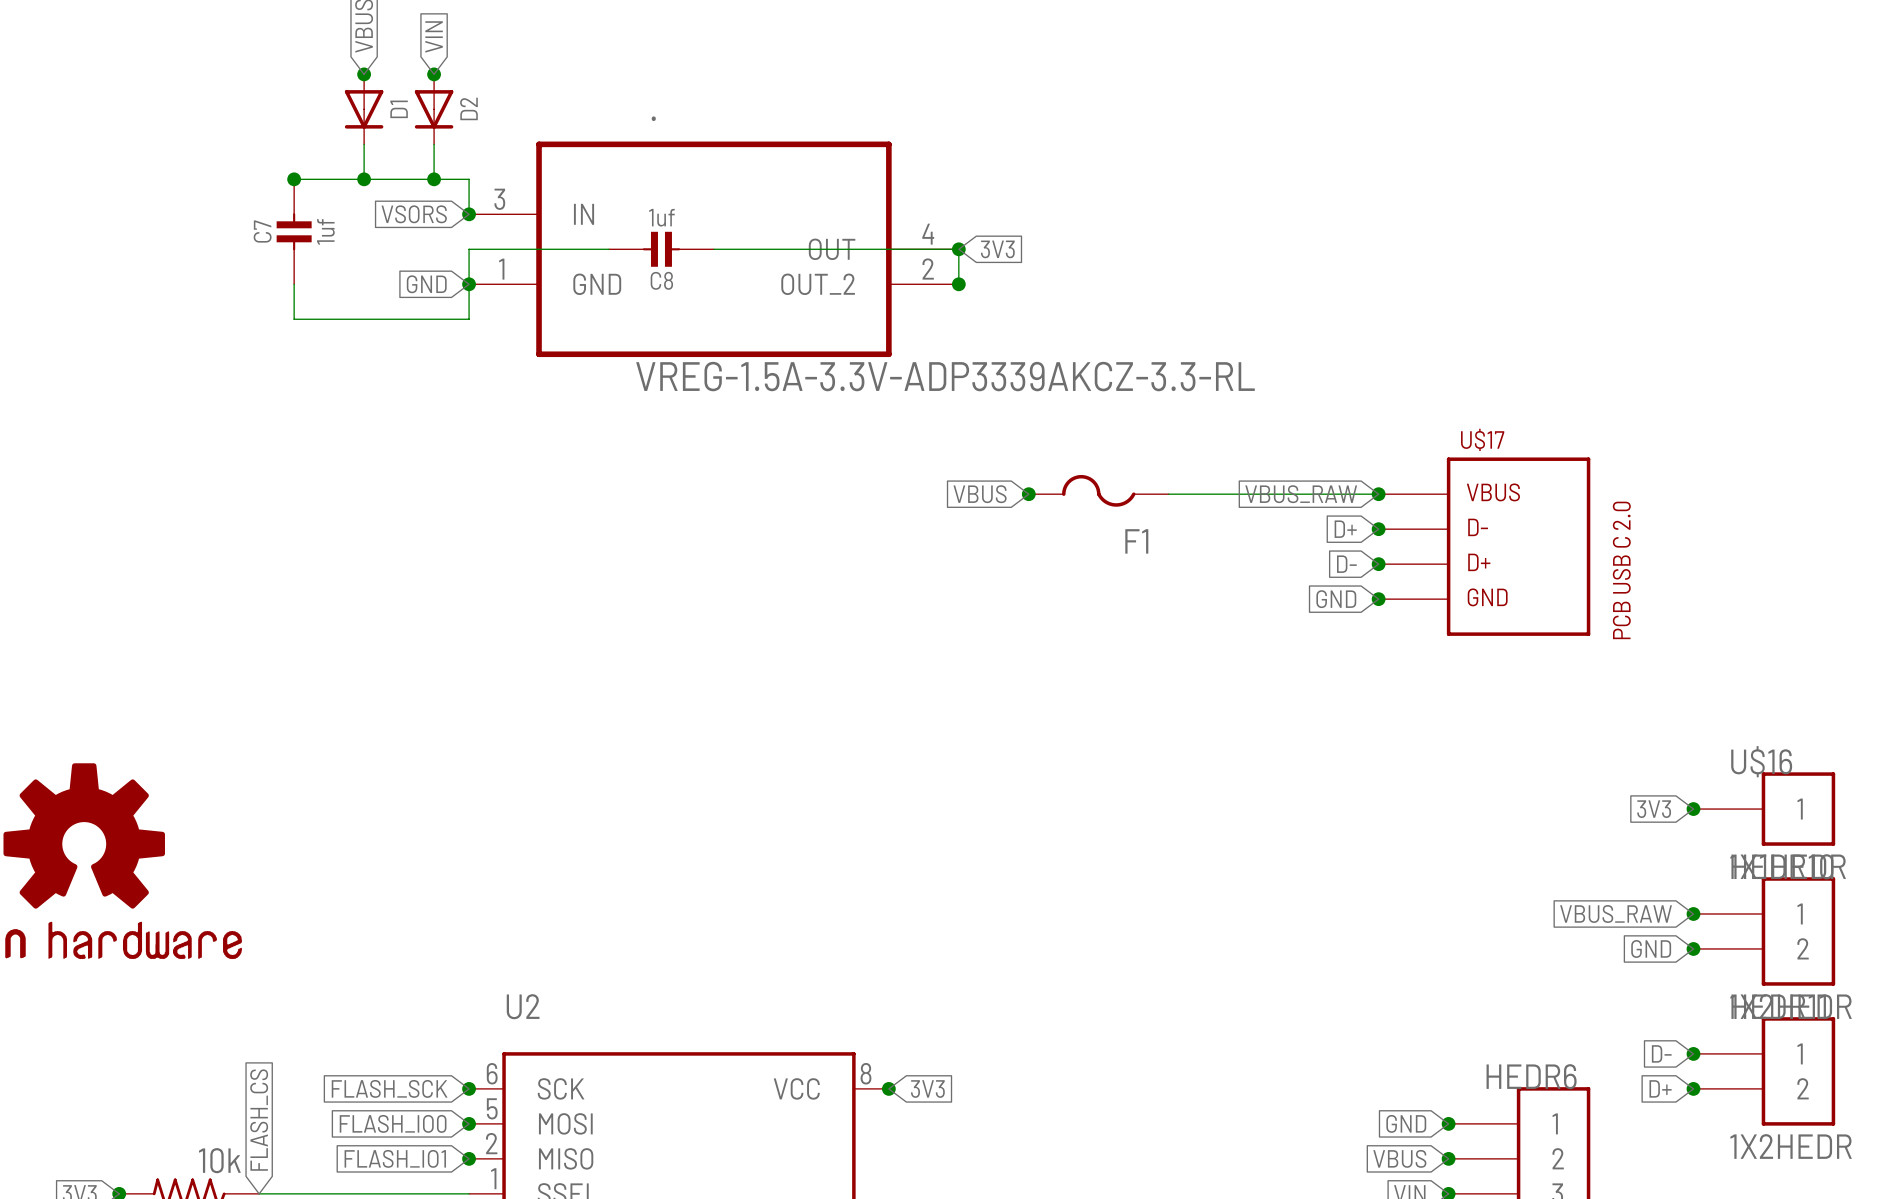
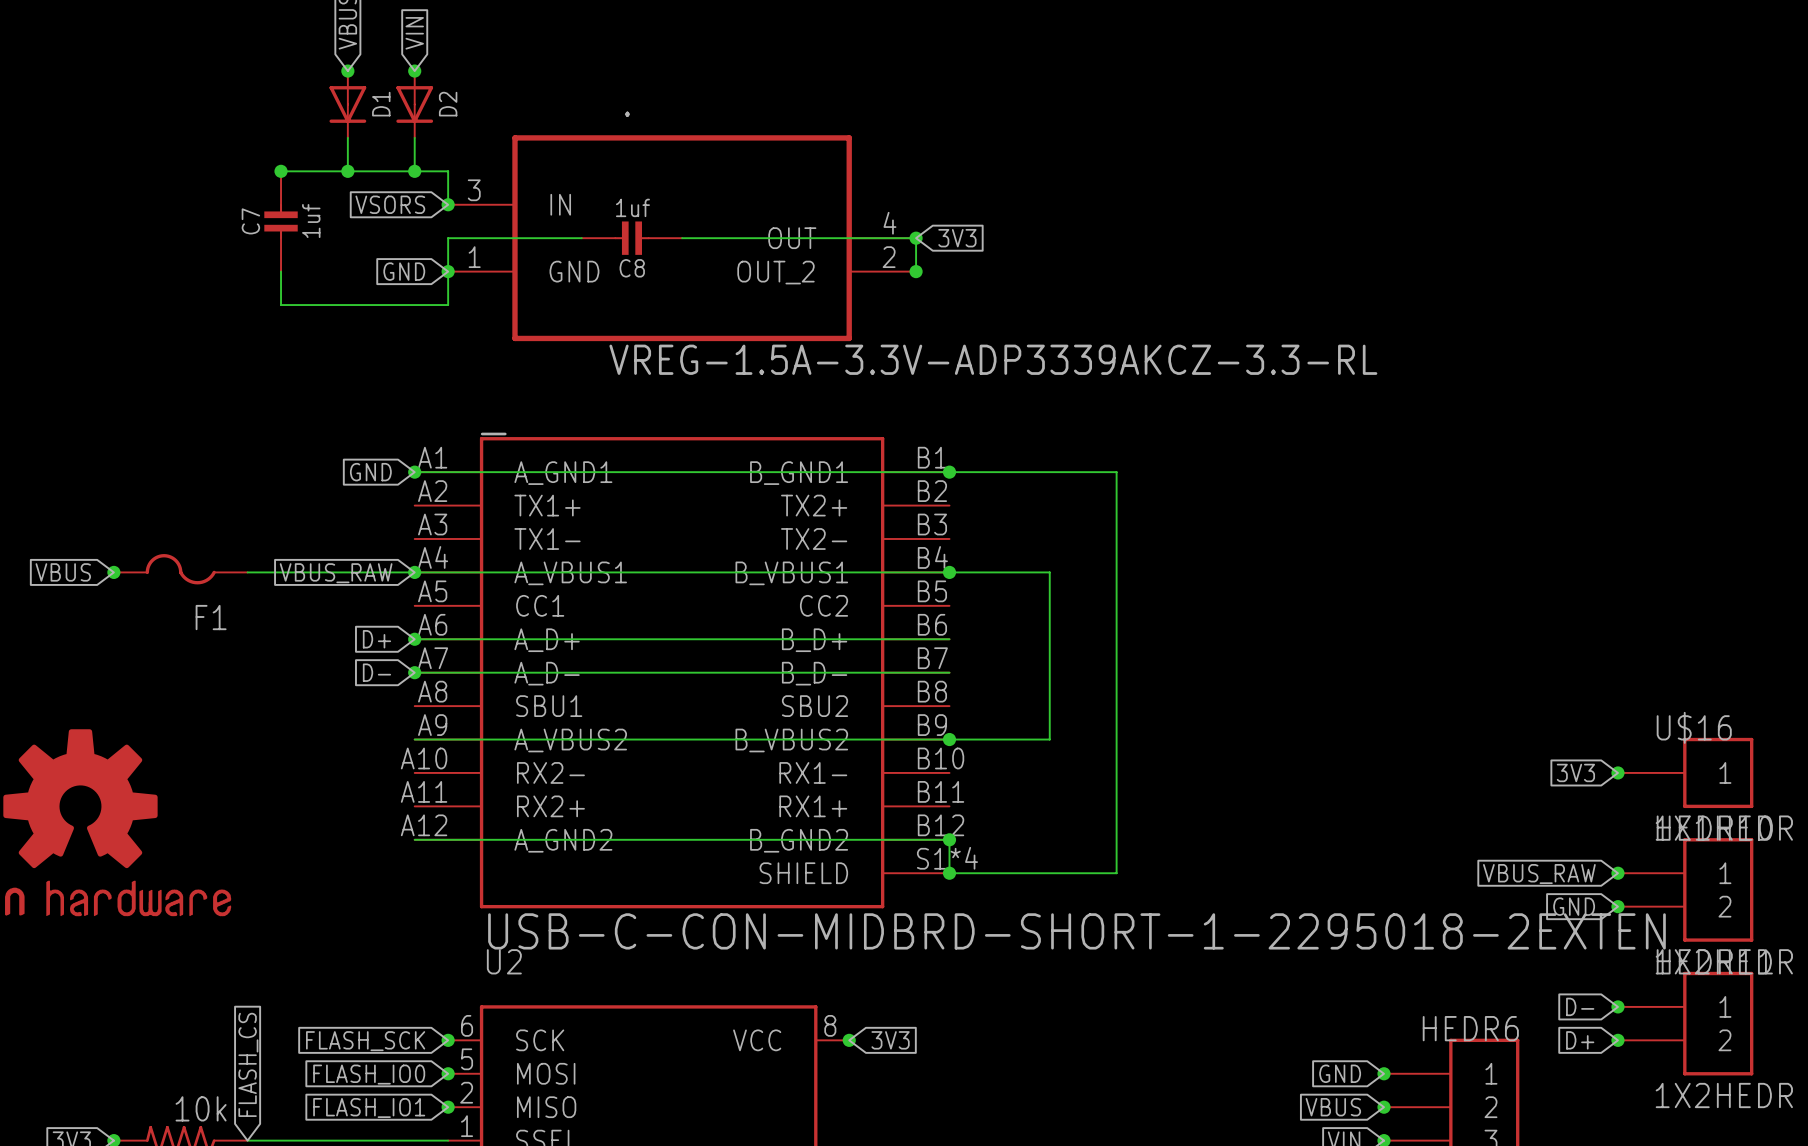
F1 position: (1098, 490) -> (180, 569)
global label: none -> GND (370, 472)
wire: none -> (414, 472) (1116, 472) (1116, 873) (949, 873) (949, 839) (414, 839)
junction: none -> (414, 472)
global label: VBUS (980, 494) -> none
junction position: (1028, 494) -> (949, 472)
wire: (1168, 494) (1378, 494) -> none
global label: VBUS_RAW (1301, 494) -> none
junction: (1378, 494) -> none
global label: D+ (1345, 529) -> none
junction: (1378, 529) -> none
U$17: (1484, 546) -> none
global label: D- (1346, 564) -> none
junction: (1378, 564) -> none
global label: none -> VBUS (63, 572)
junction: none -> (113, 572)
wire: none -> (247, 572) (1049, 572) (1049, 739) (414, 739)
global label: none -> VBUS_RAW (336, 573)
junction: none -> (414, 572)
junction: none -> (949, 572)
global label: GND (1336, 599) -> none
junction: (1378, 599) -> none
global label: none -> D+ (376, 639)
wire: none -> (414, 639) (949, 639)
junction: none -> (414, 639)
global label: none -> D- (376, 672)
wire: none -> (414, 672) (949, 672)
junction: none -> (414, 672)
part: none -> USB-C-CON-MIDBRD-SHORT-1-2295018-2EXTEN (682, 672)
junction: none -> (949, 739)
junction: none -> (949, 839)
junction: none -> (949, 873)

